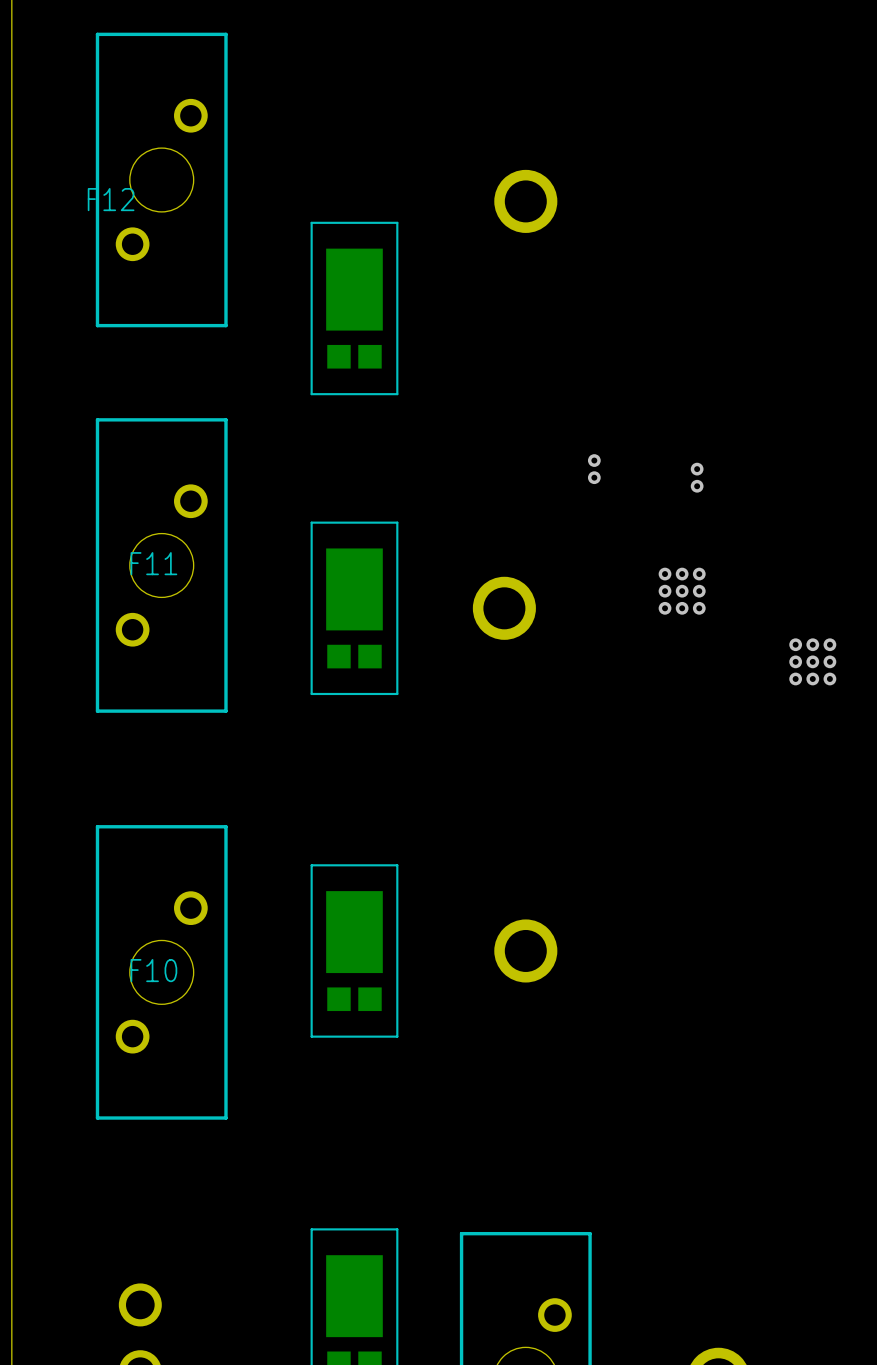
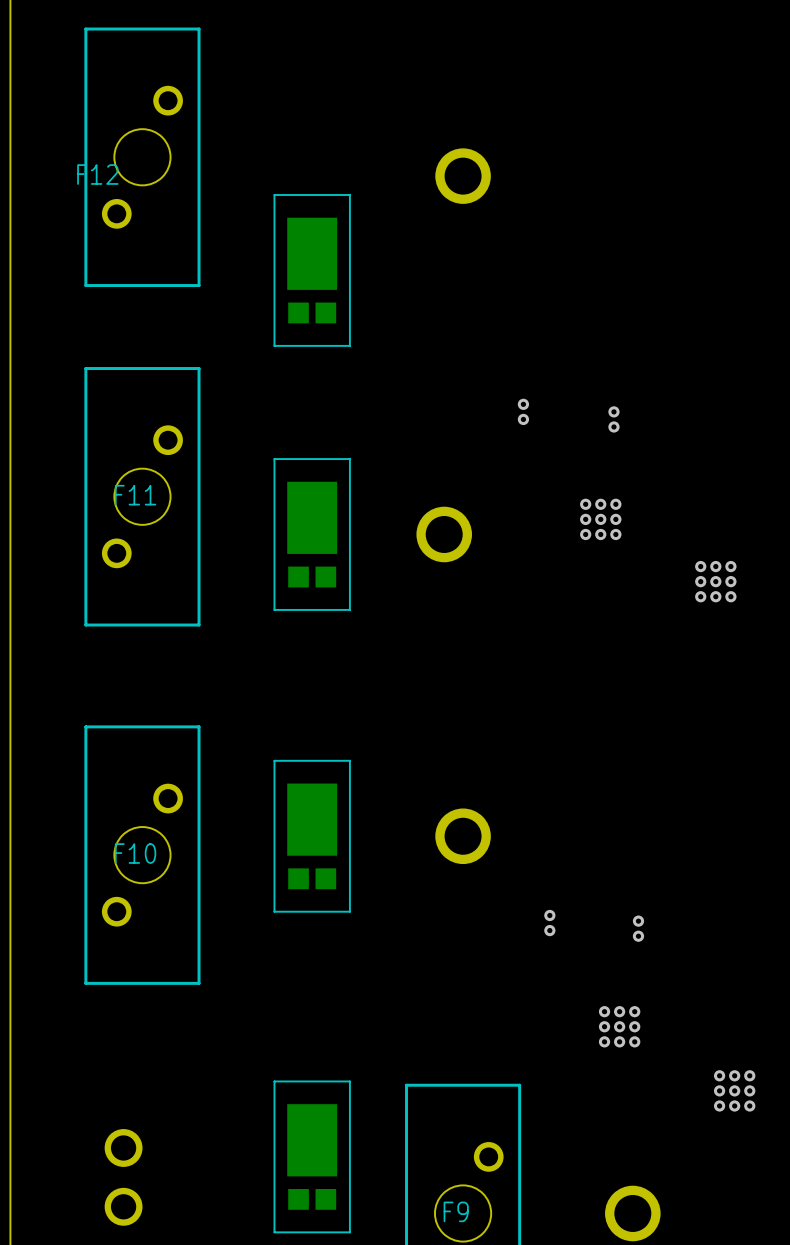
via: none -> (549, 915)
via: none -> (638, 921)
via: none -> (549, 930)
via: none -> (638, 936)
via: none -> (604, 1011)
via: none -> (619, 1011)
via: none -> (634, 1011)
via: none -> (604, 1026)
via: none -> (619, 1026)
via: none -> (634, 1026)
via: none -> (604, 1041)
via: none -> (619, 1041)
via: none -> (634, 1041)
via: none -> (719, 1075)
via: none -> (734, 1075)
via: none -> (749, 1075)
via: none -> (719, 1090)
via: none -> (734, 1090)
via: none -> (749, 1090)
via: none -> (719, 1105)
via: none -> (734, 1105)
via: none -> (749, 1105)

